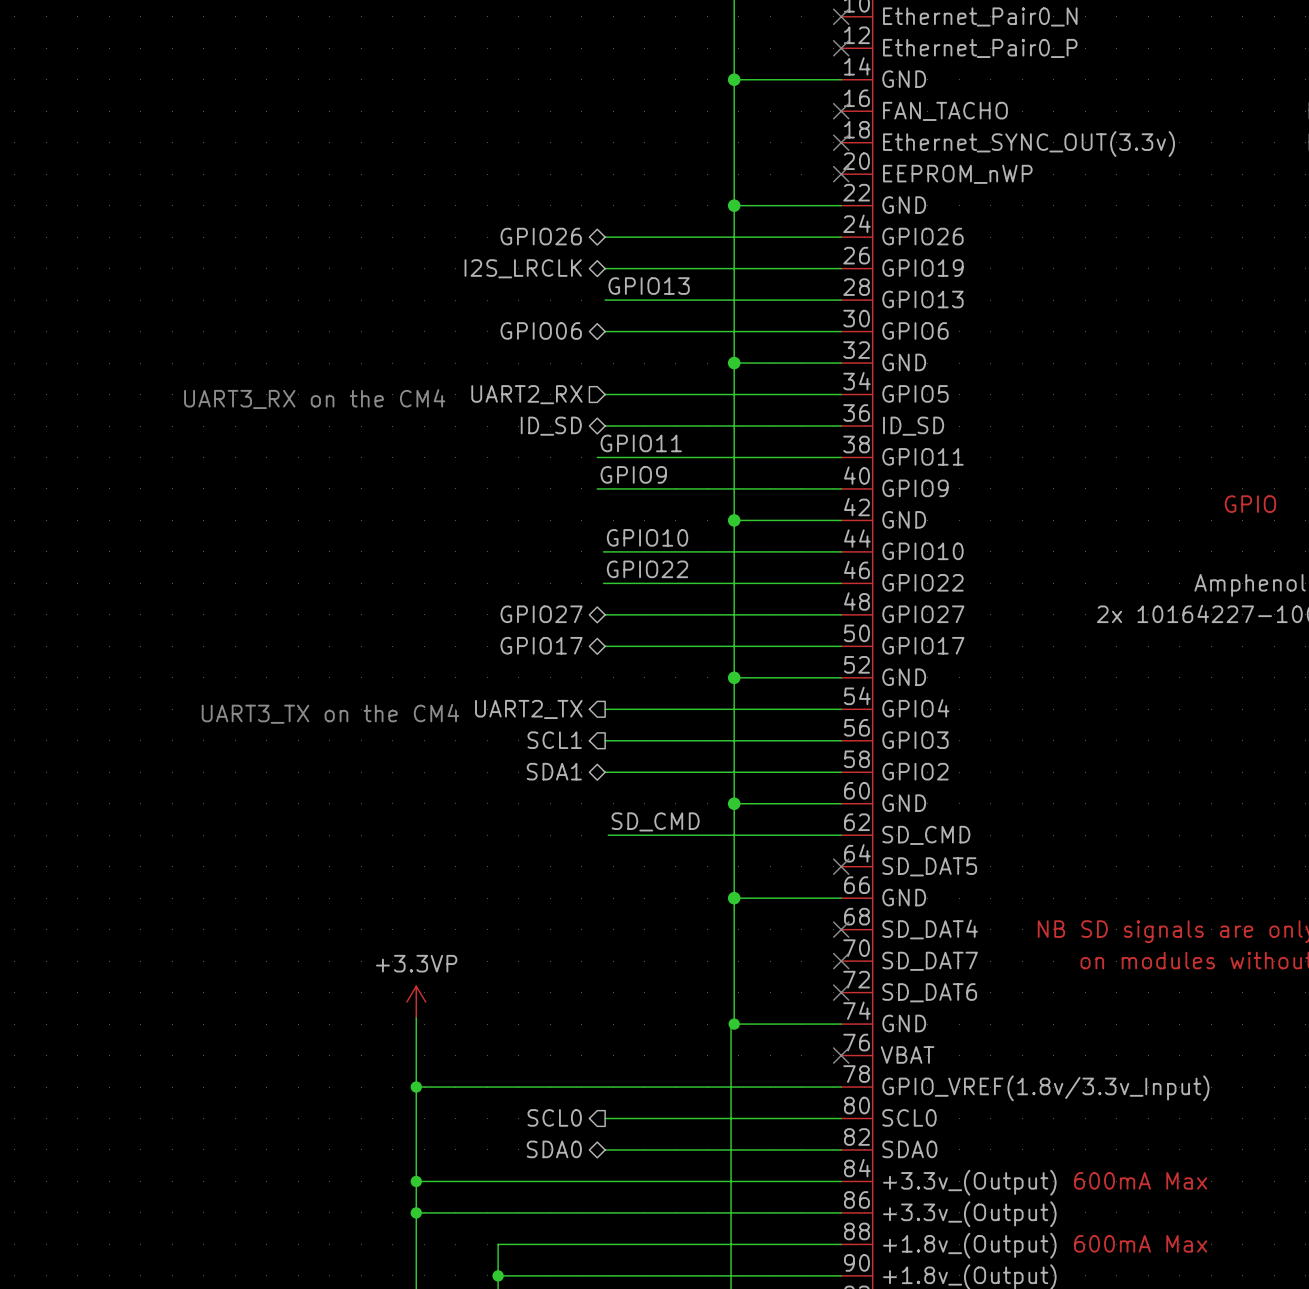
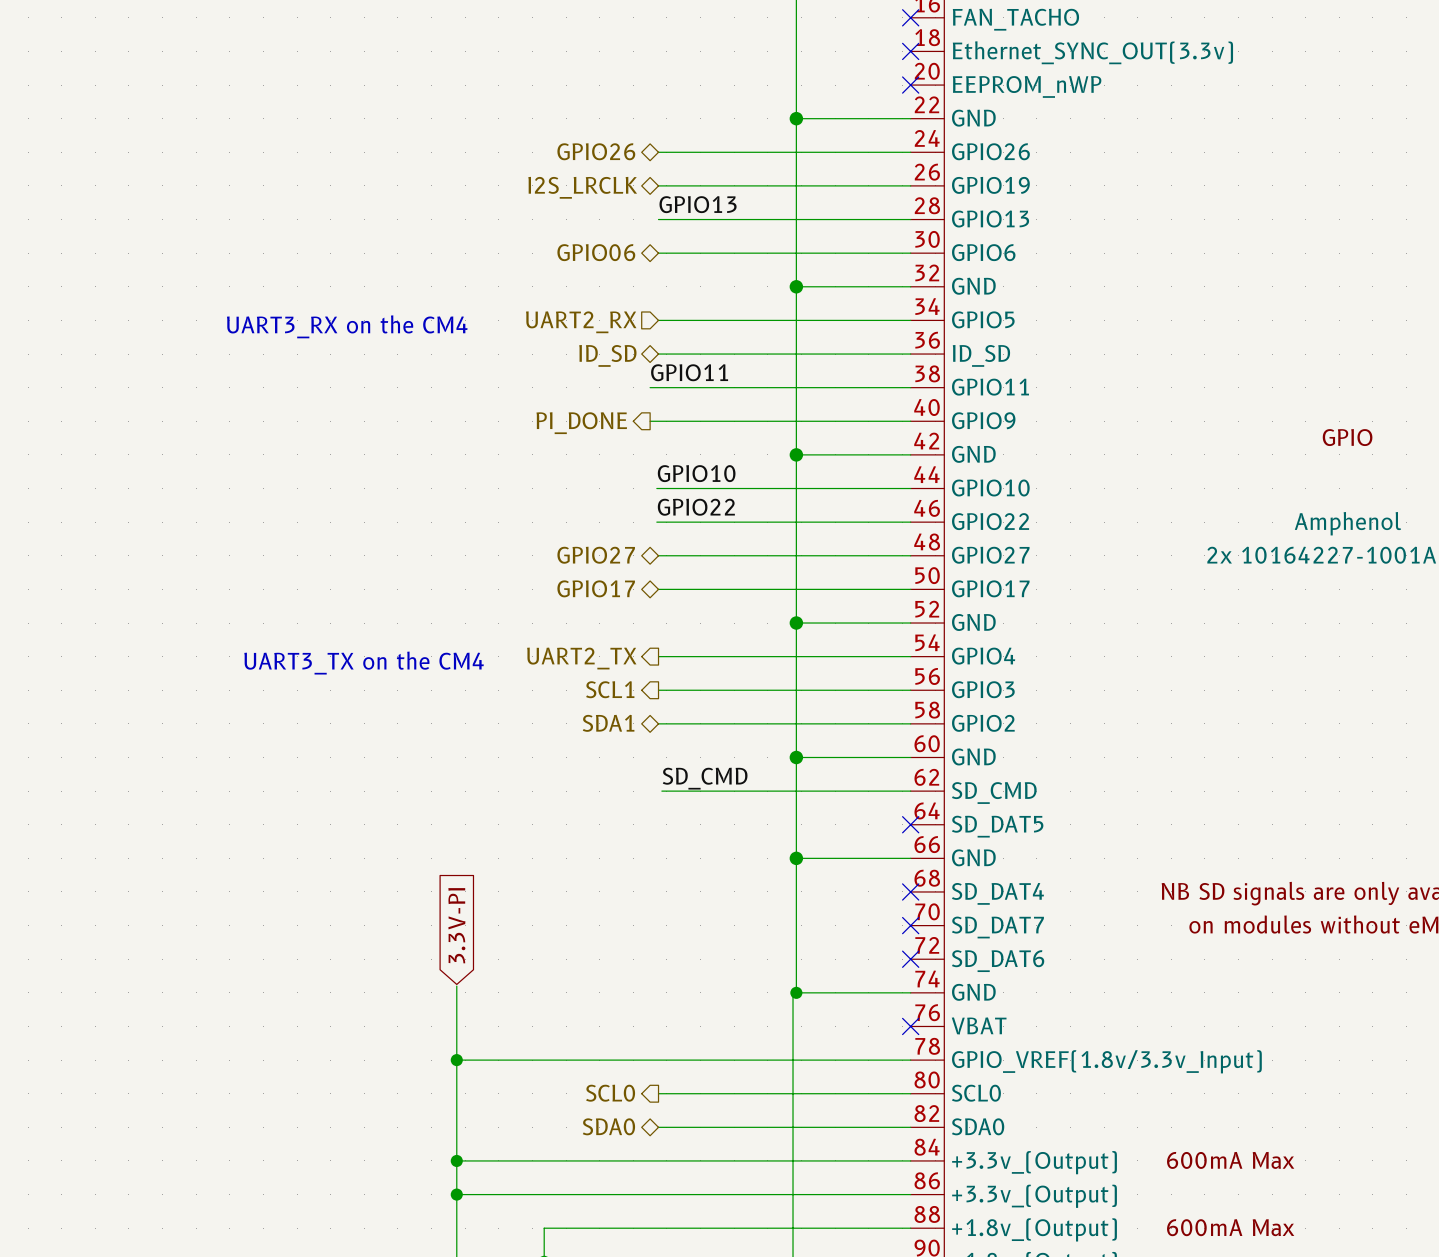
label: GPIO9 (633, 474) -> none
hierarchical label: none -> PI_DONE (581, 423)
global label: none -> 3.3V-PI (456, 925)
power symbol: +3.3VP (416, 1002) -> none

